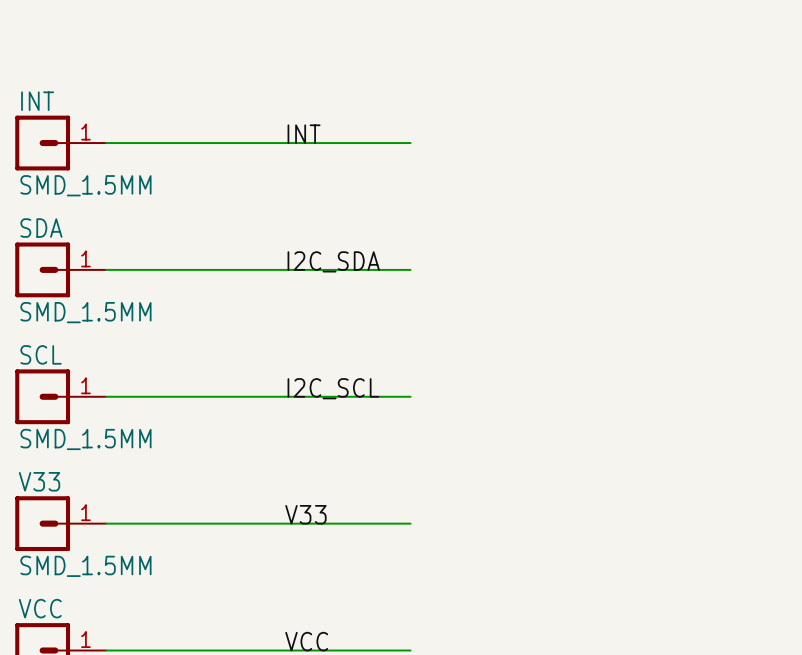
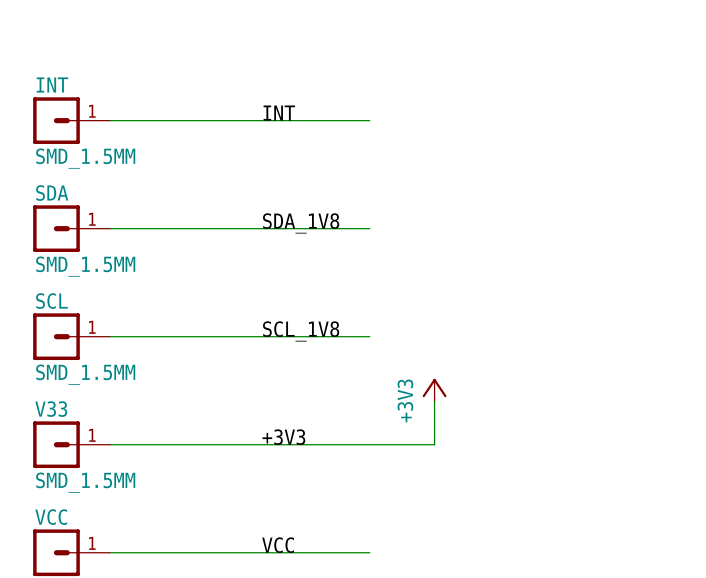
label: I2C_SDA (333, 261) -> SDA_1V8 (301, 223)
label: I2C_SCL (333, 388) -> SCL_1V8 (301, 331)
power symbol: none -> +3V3 (434, 390)
wire: none -> (434, 401) (434, 444) (369, 444)
label: V33 (305, 514) -> +3V3 (283, 437)

